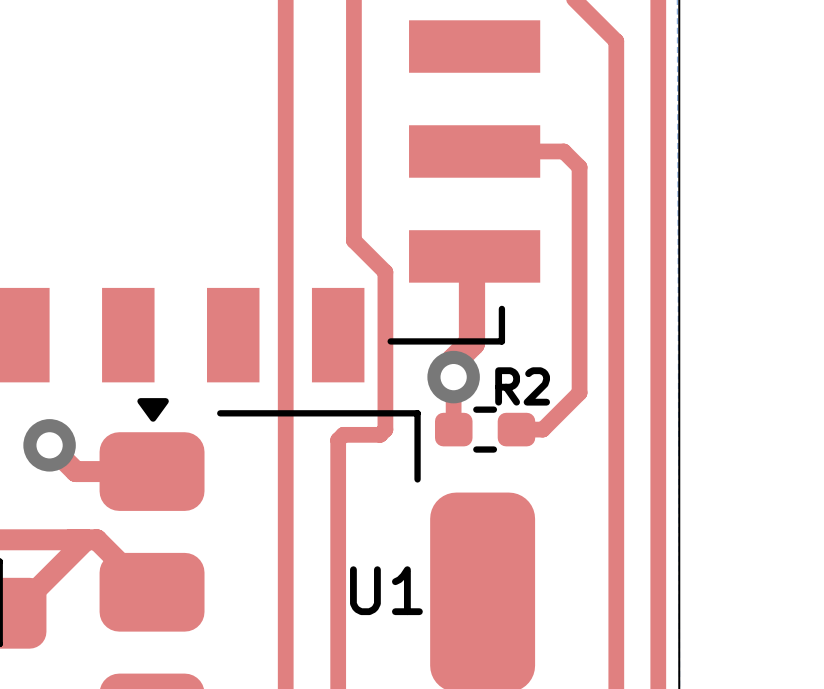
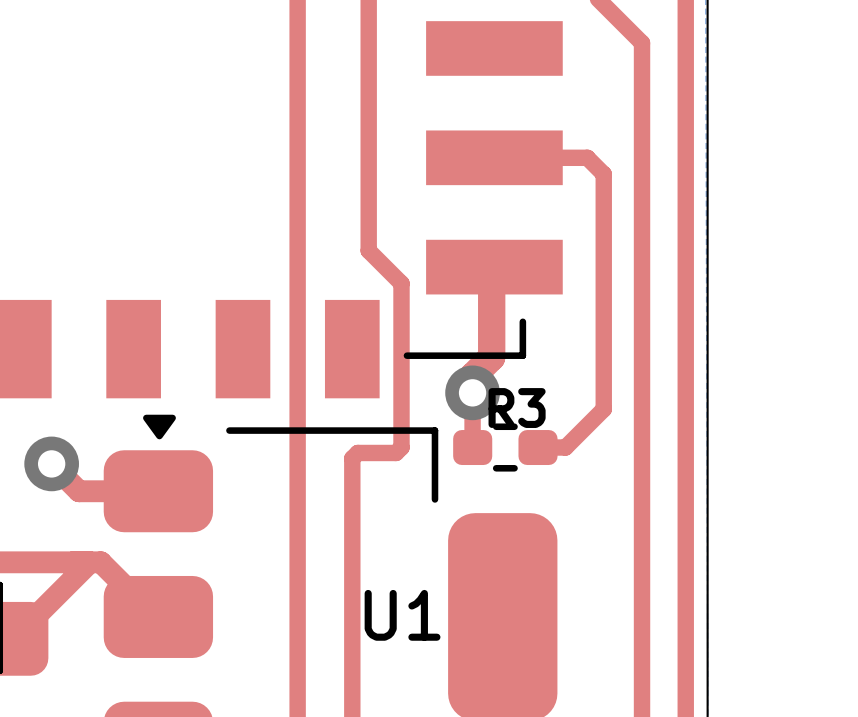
R2 name: R2 (522, 386) -> R3 (517, 408)

